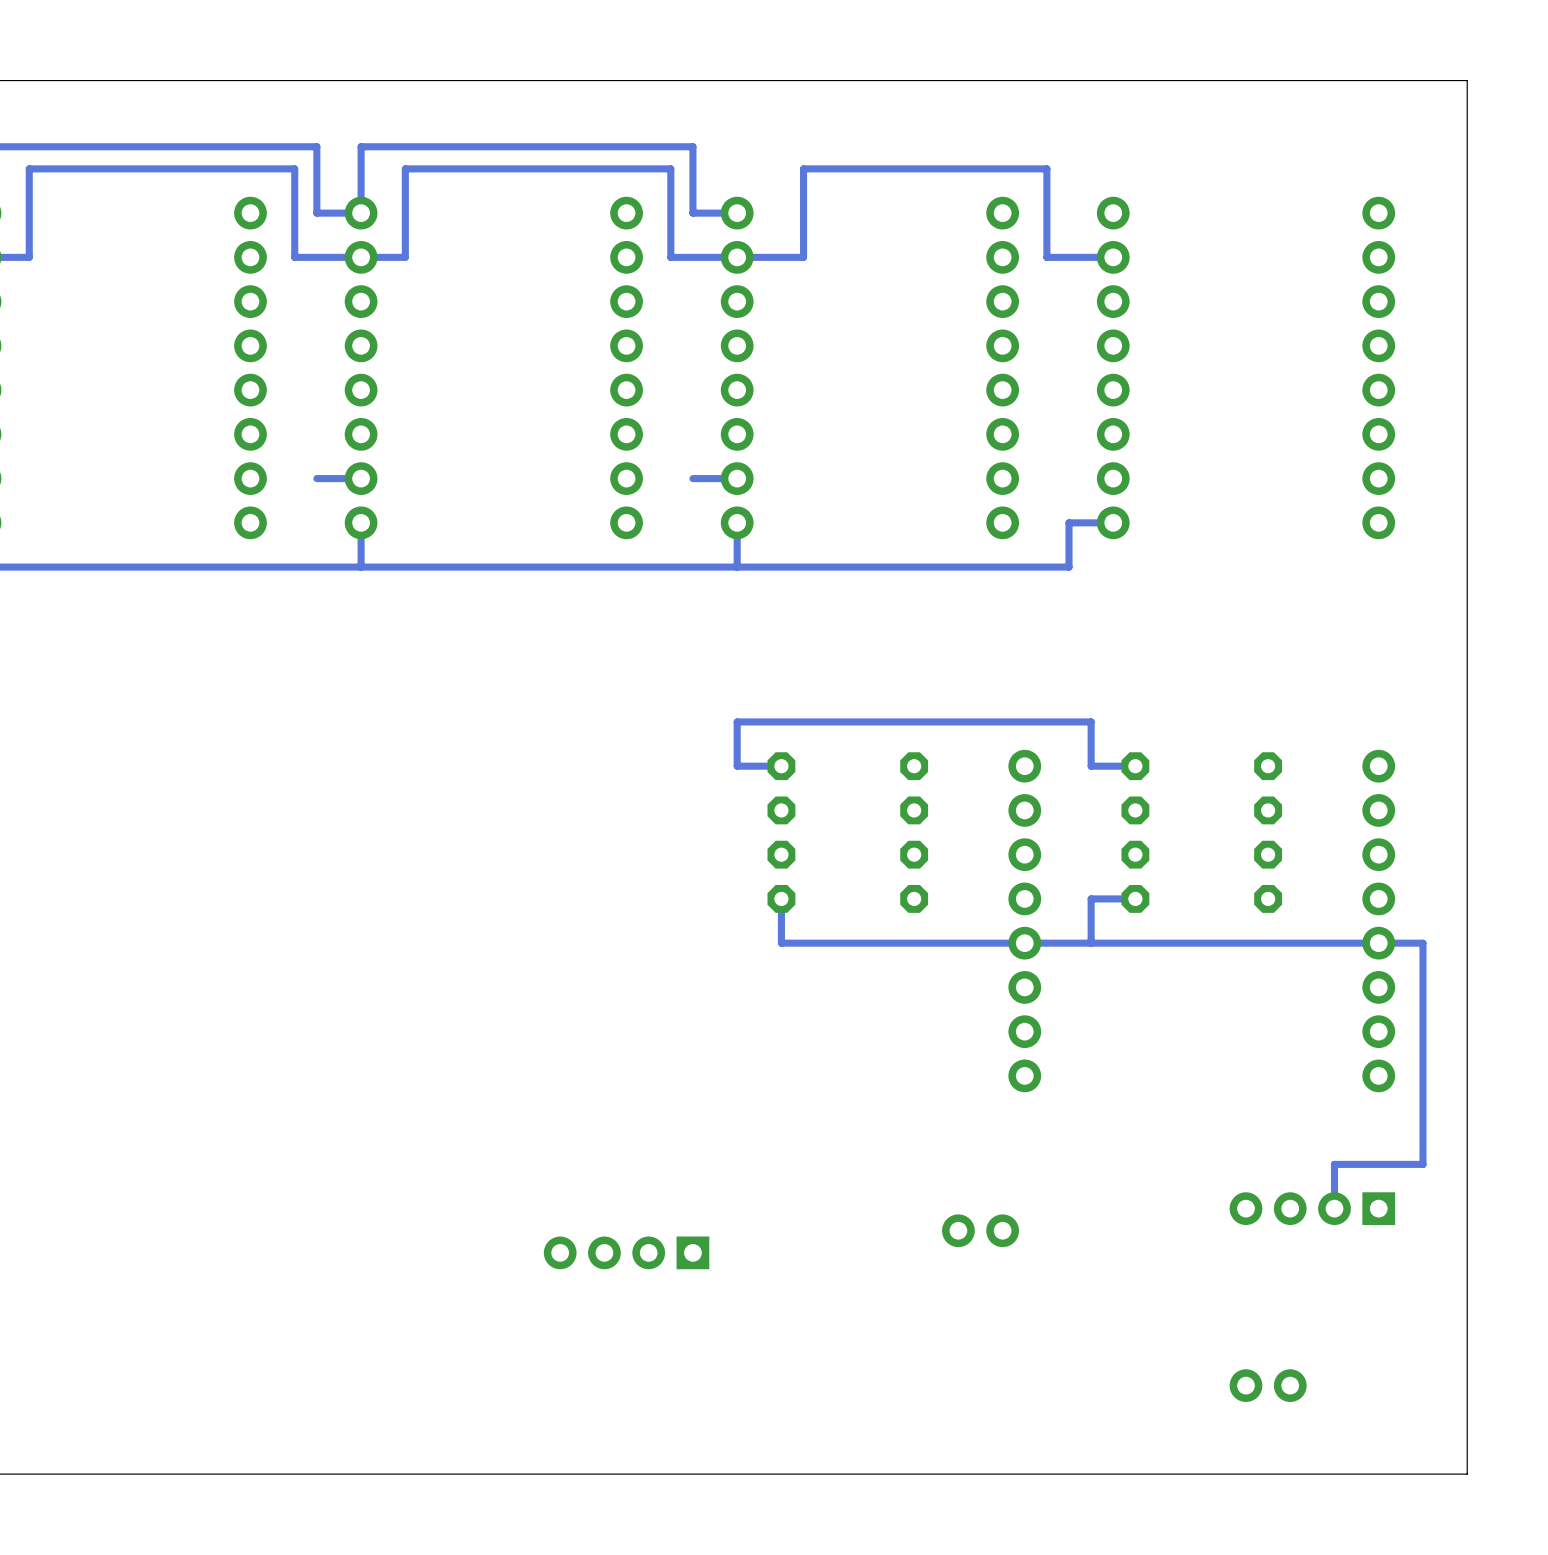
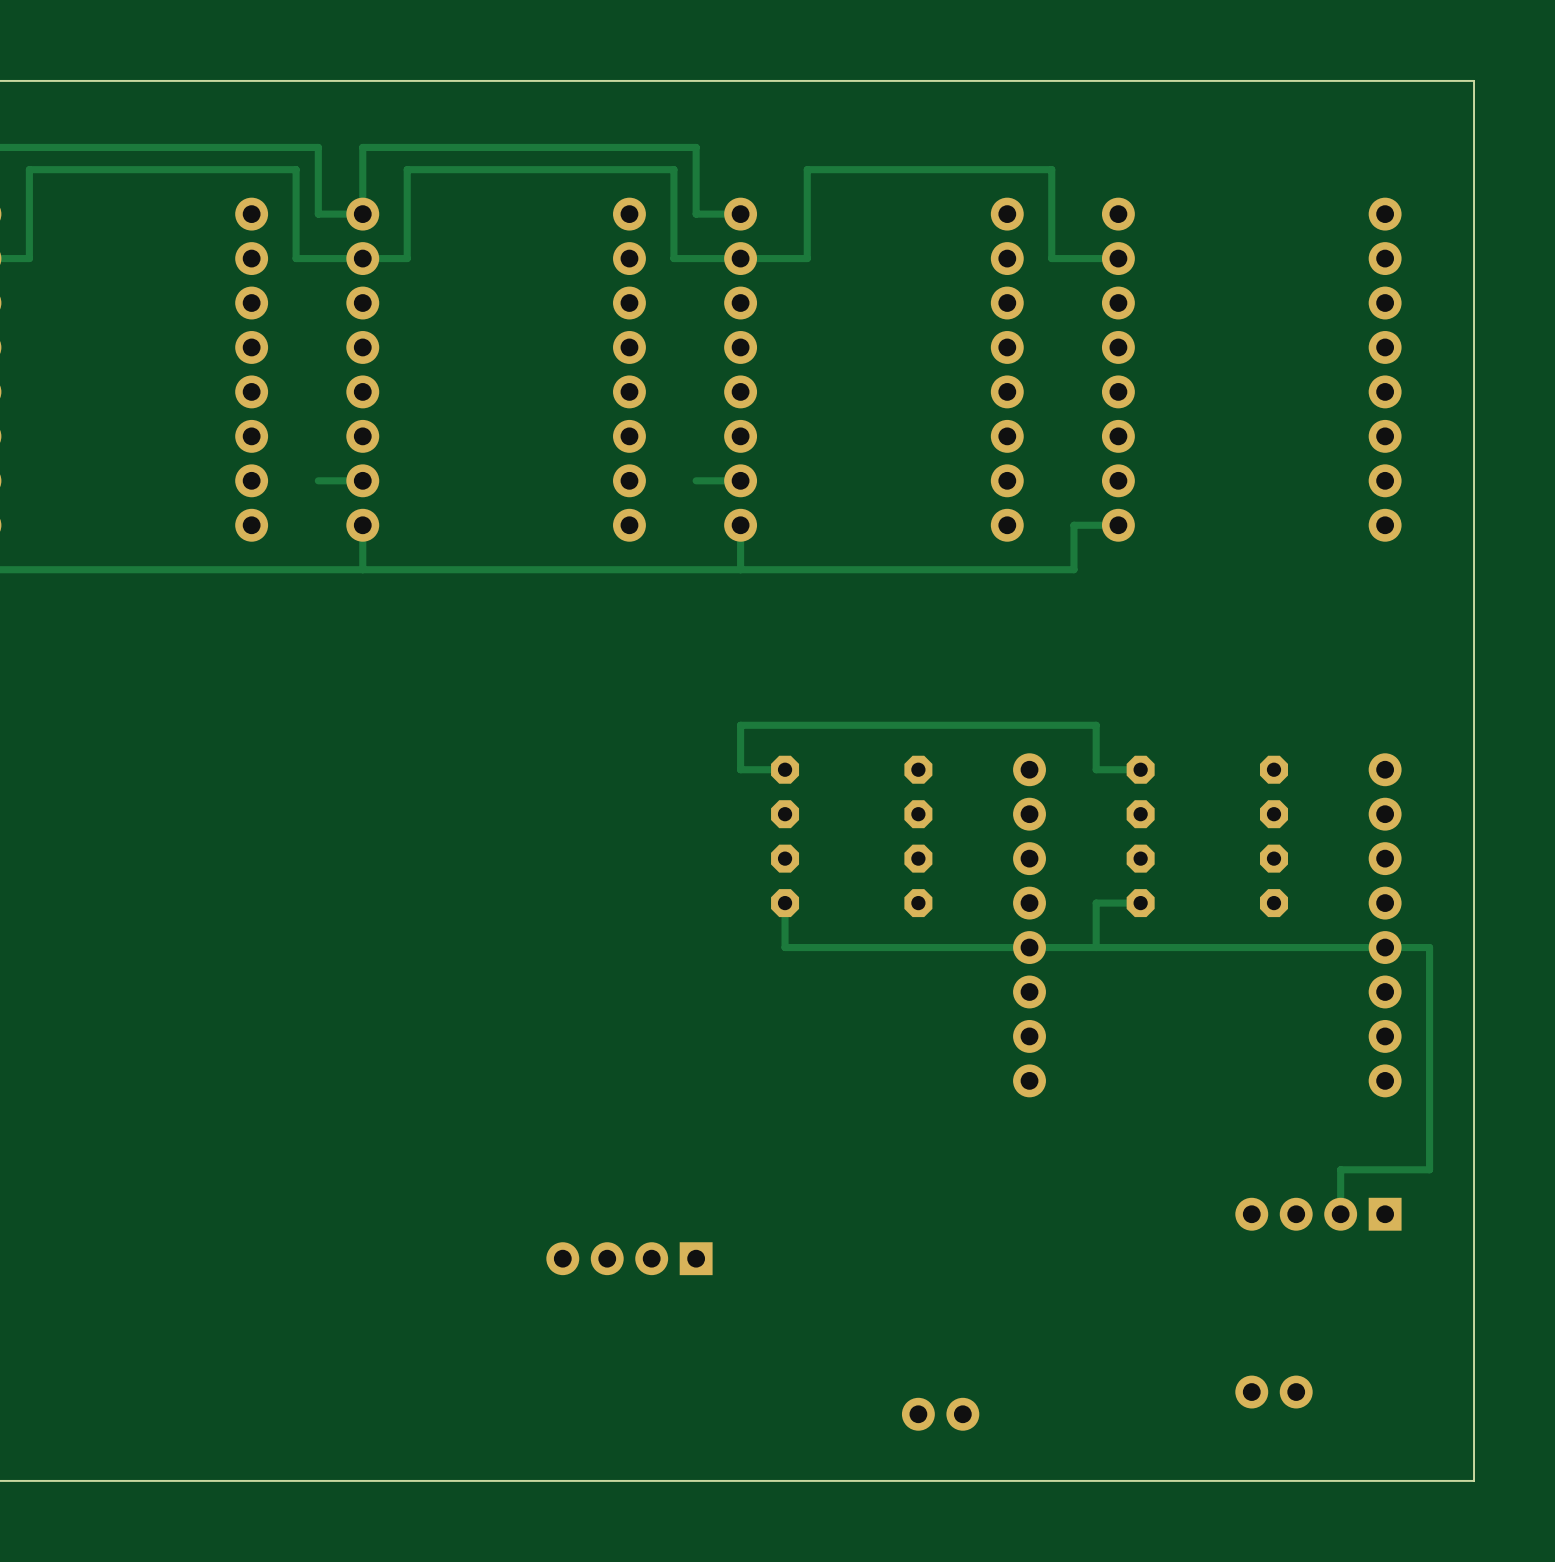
part position: (980, 1230) -> (940, 1414)

